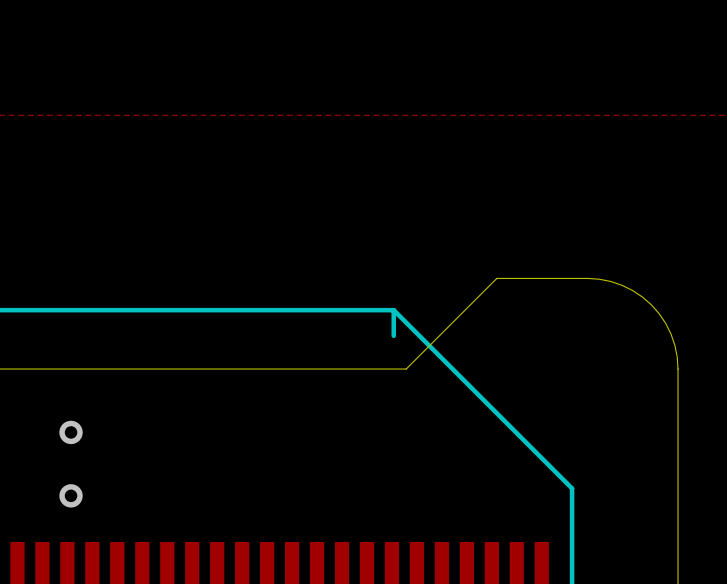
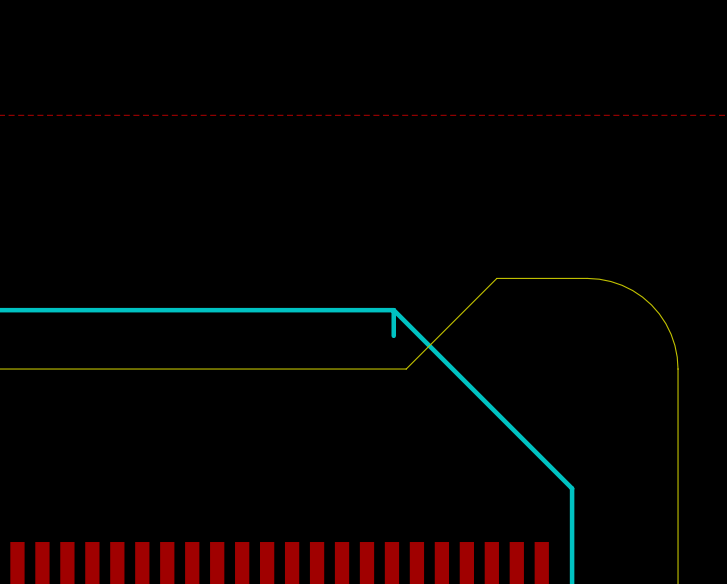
via: (71, 432) -> none
via: (71, 495) -> none

